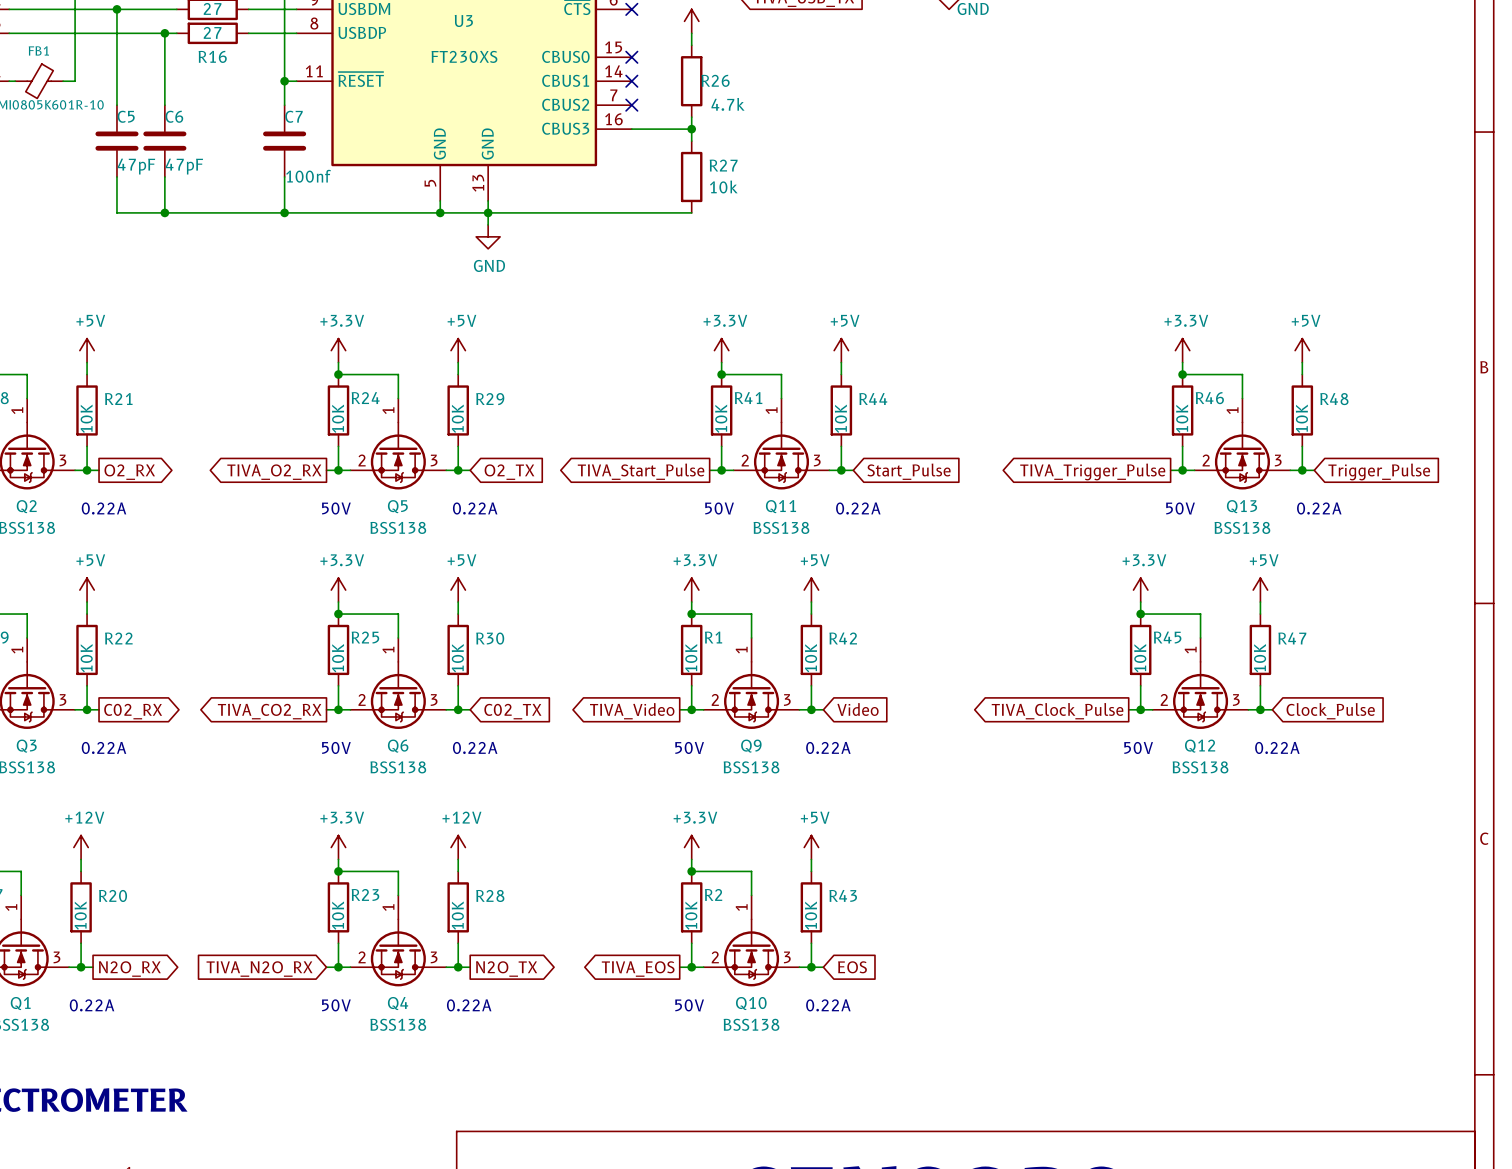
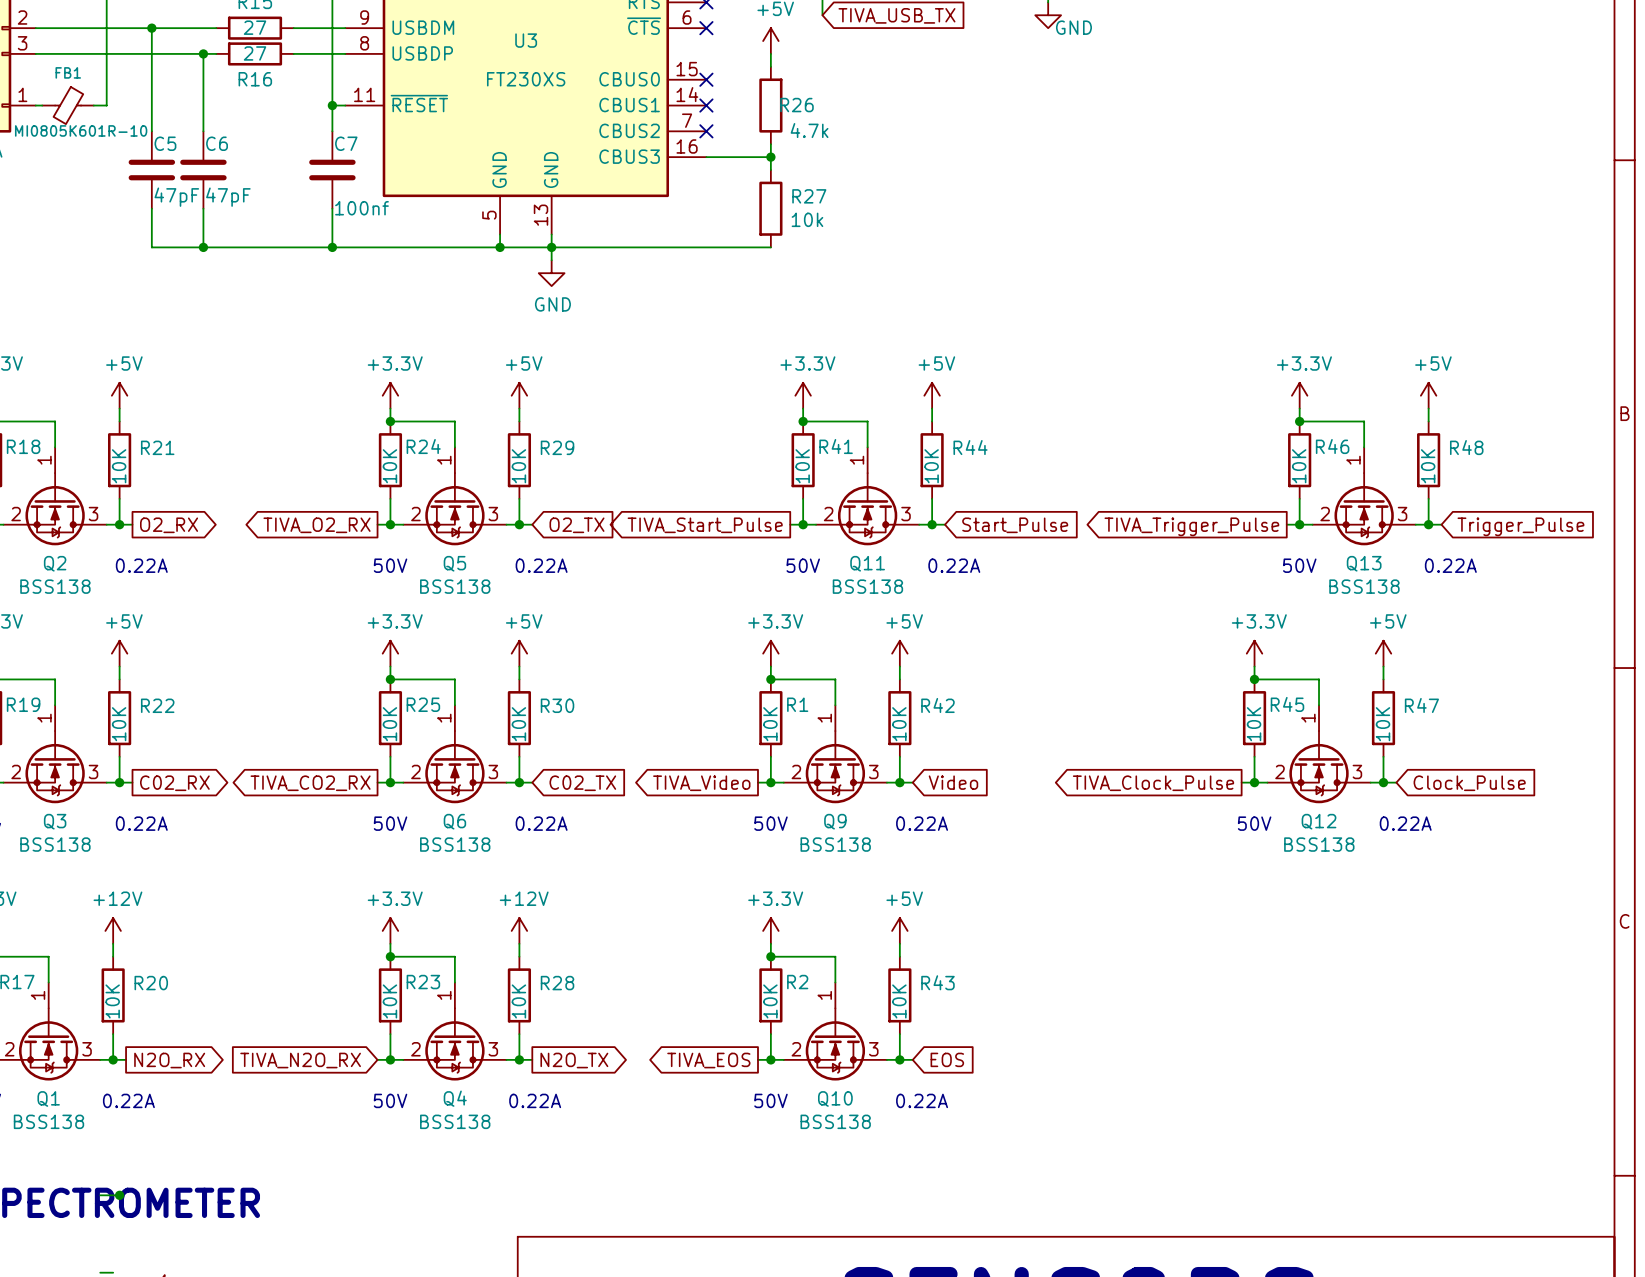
wire: none -> (100, 1195) (119, 1195)
junction: none -> (119, 1195)
wire: none -> (100, 1272) (113, 1272)

